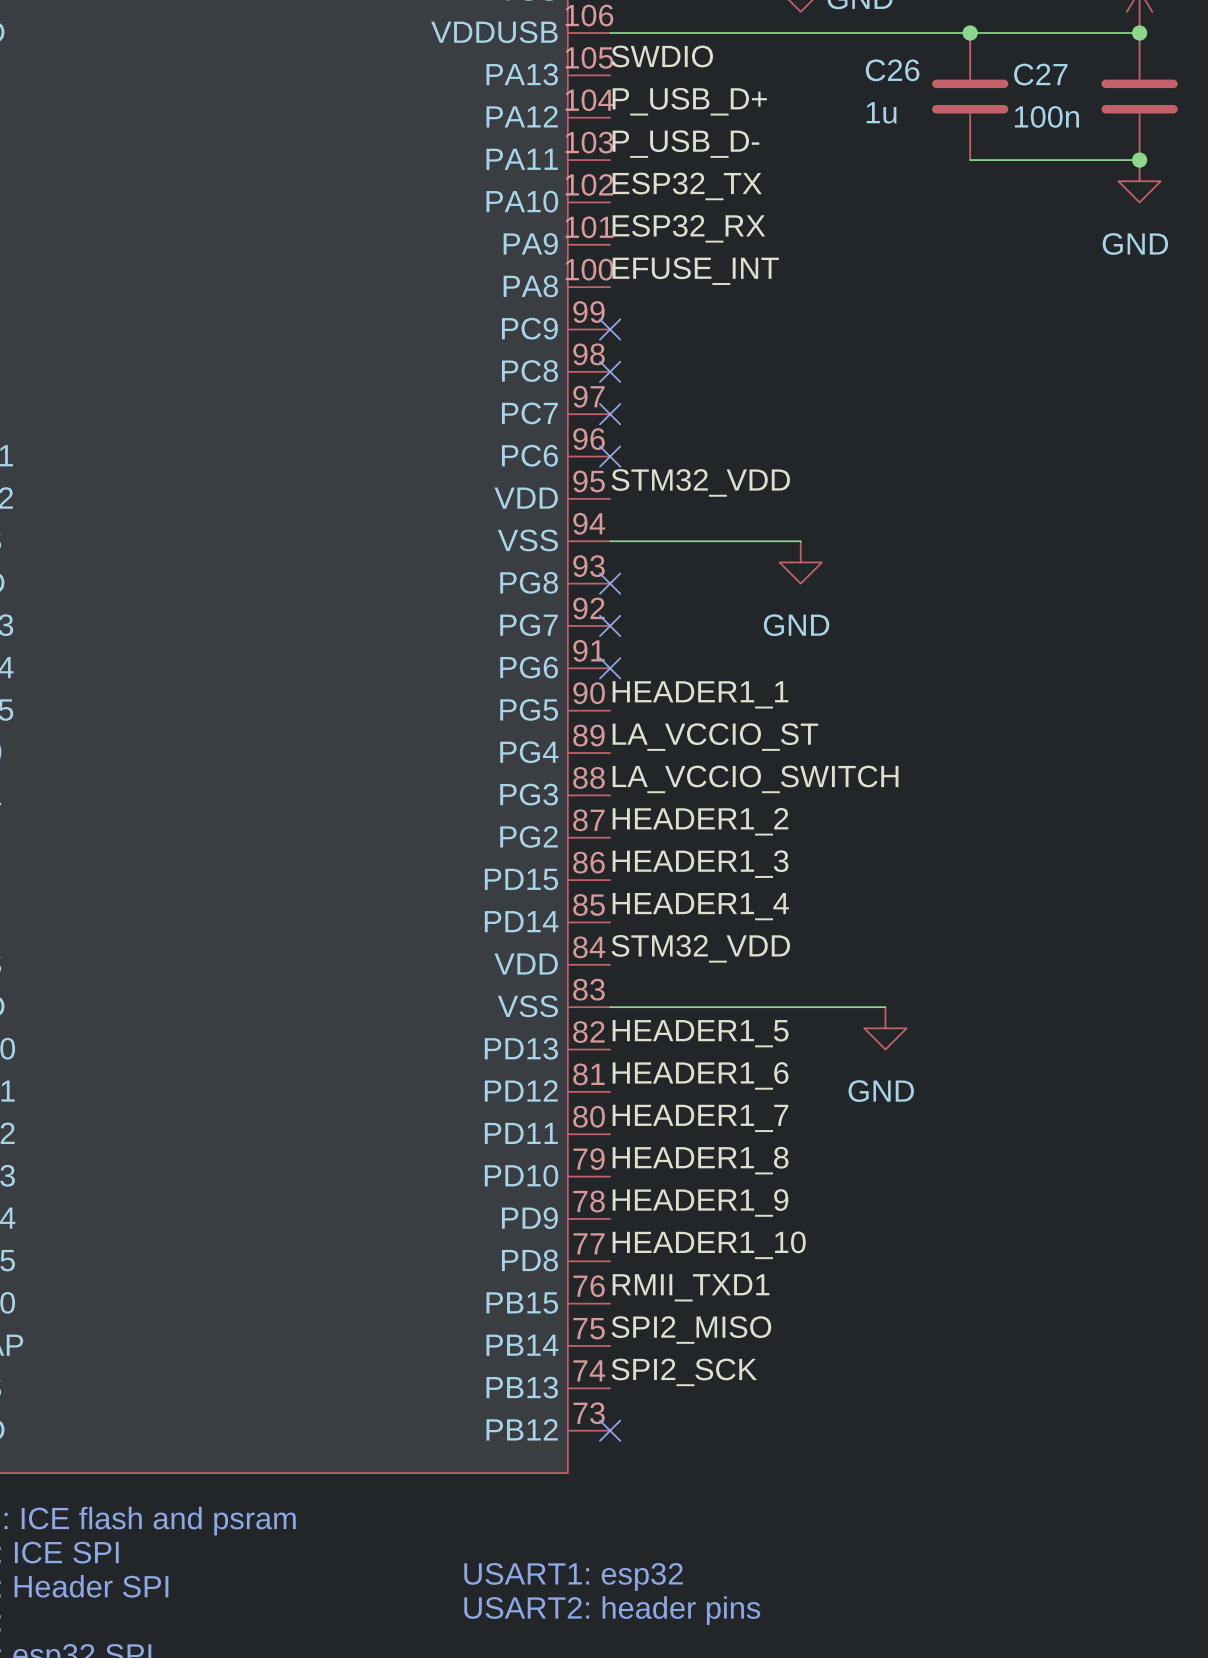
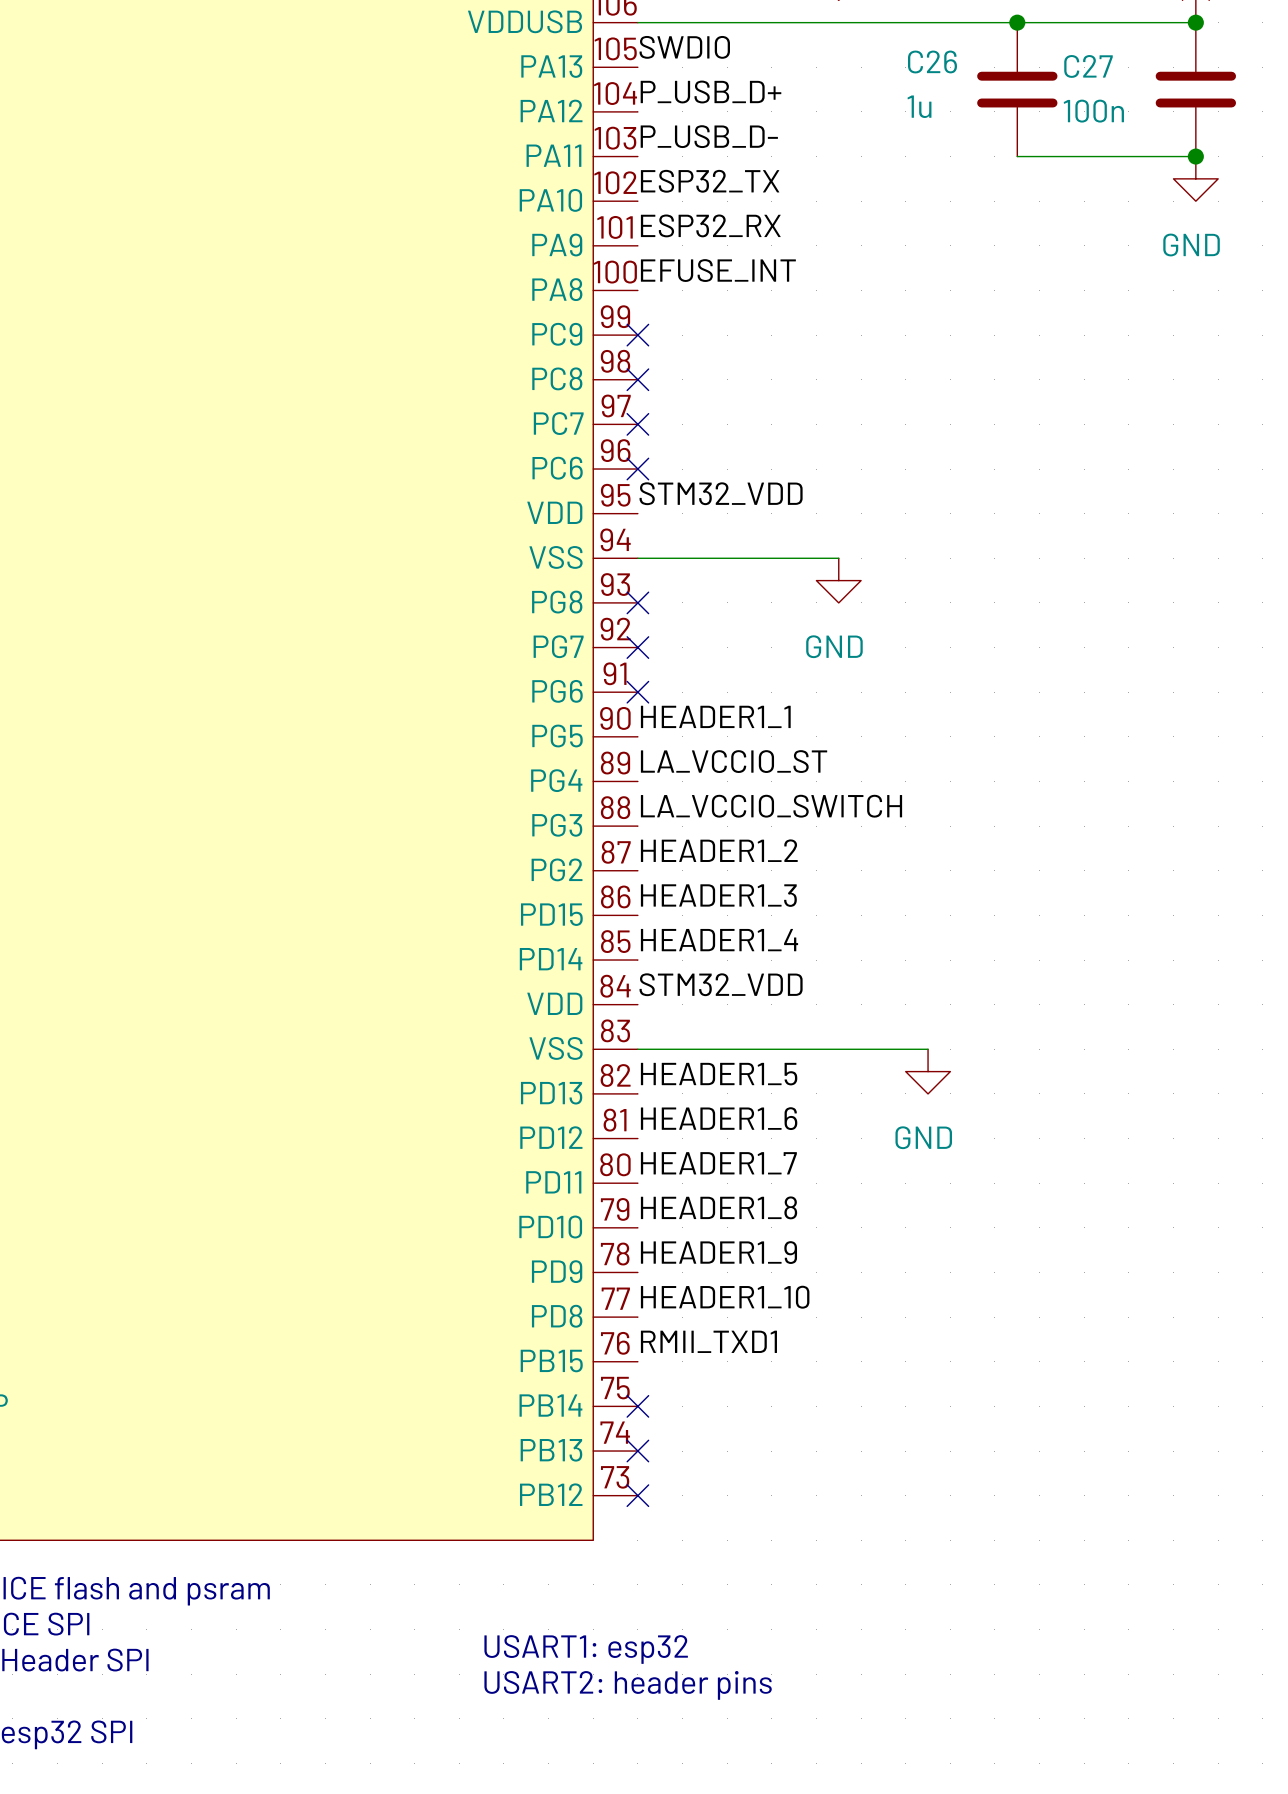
label: SPI2_MISO (691, 1330) -> none
no-connect mark: none -> (637, 1406)
label: SPI2_SCK (684, 1372) -> none
no-connect mark: none -> (637, 1451)

